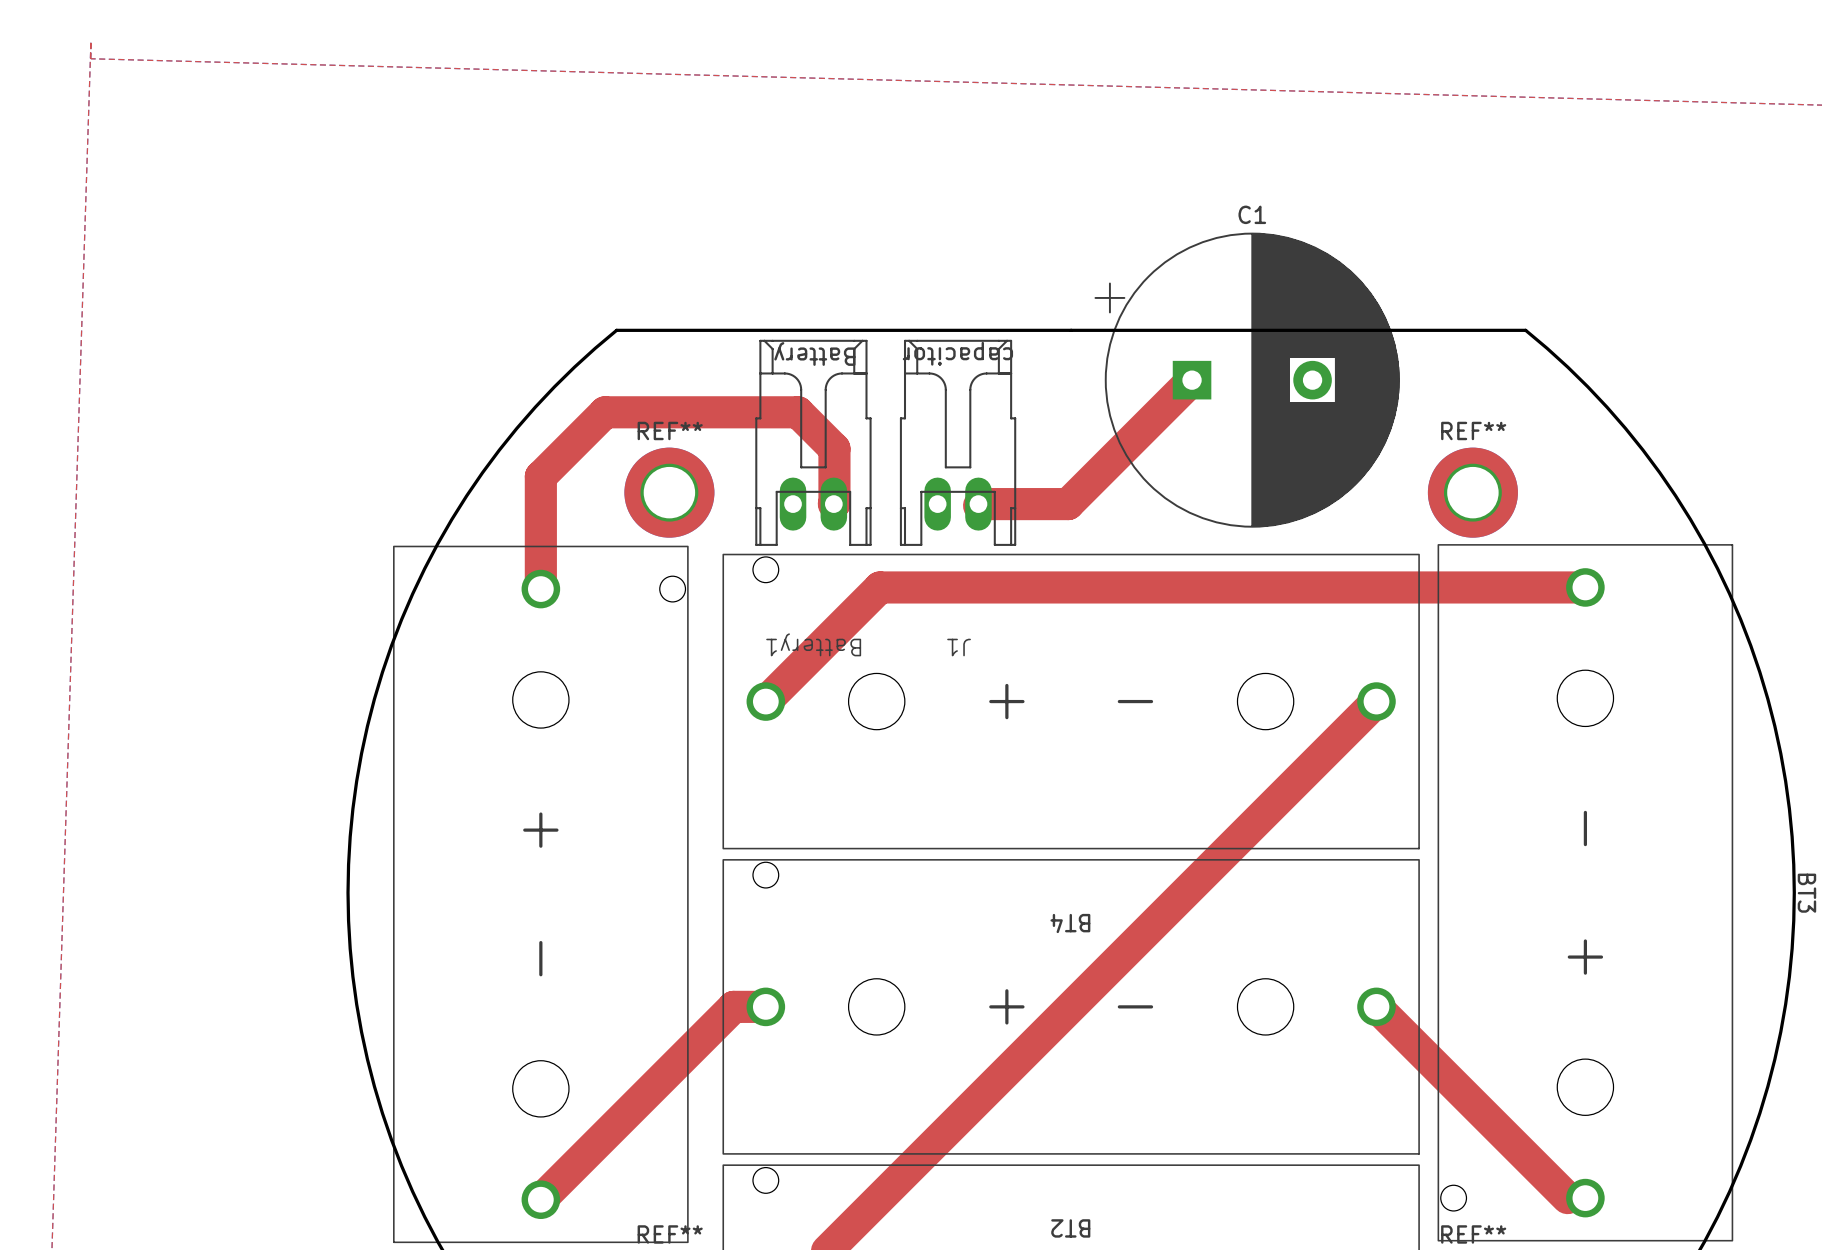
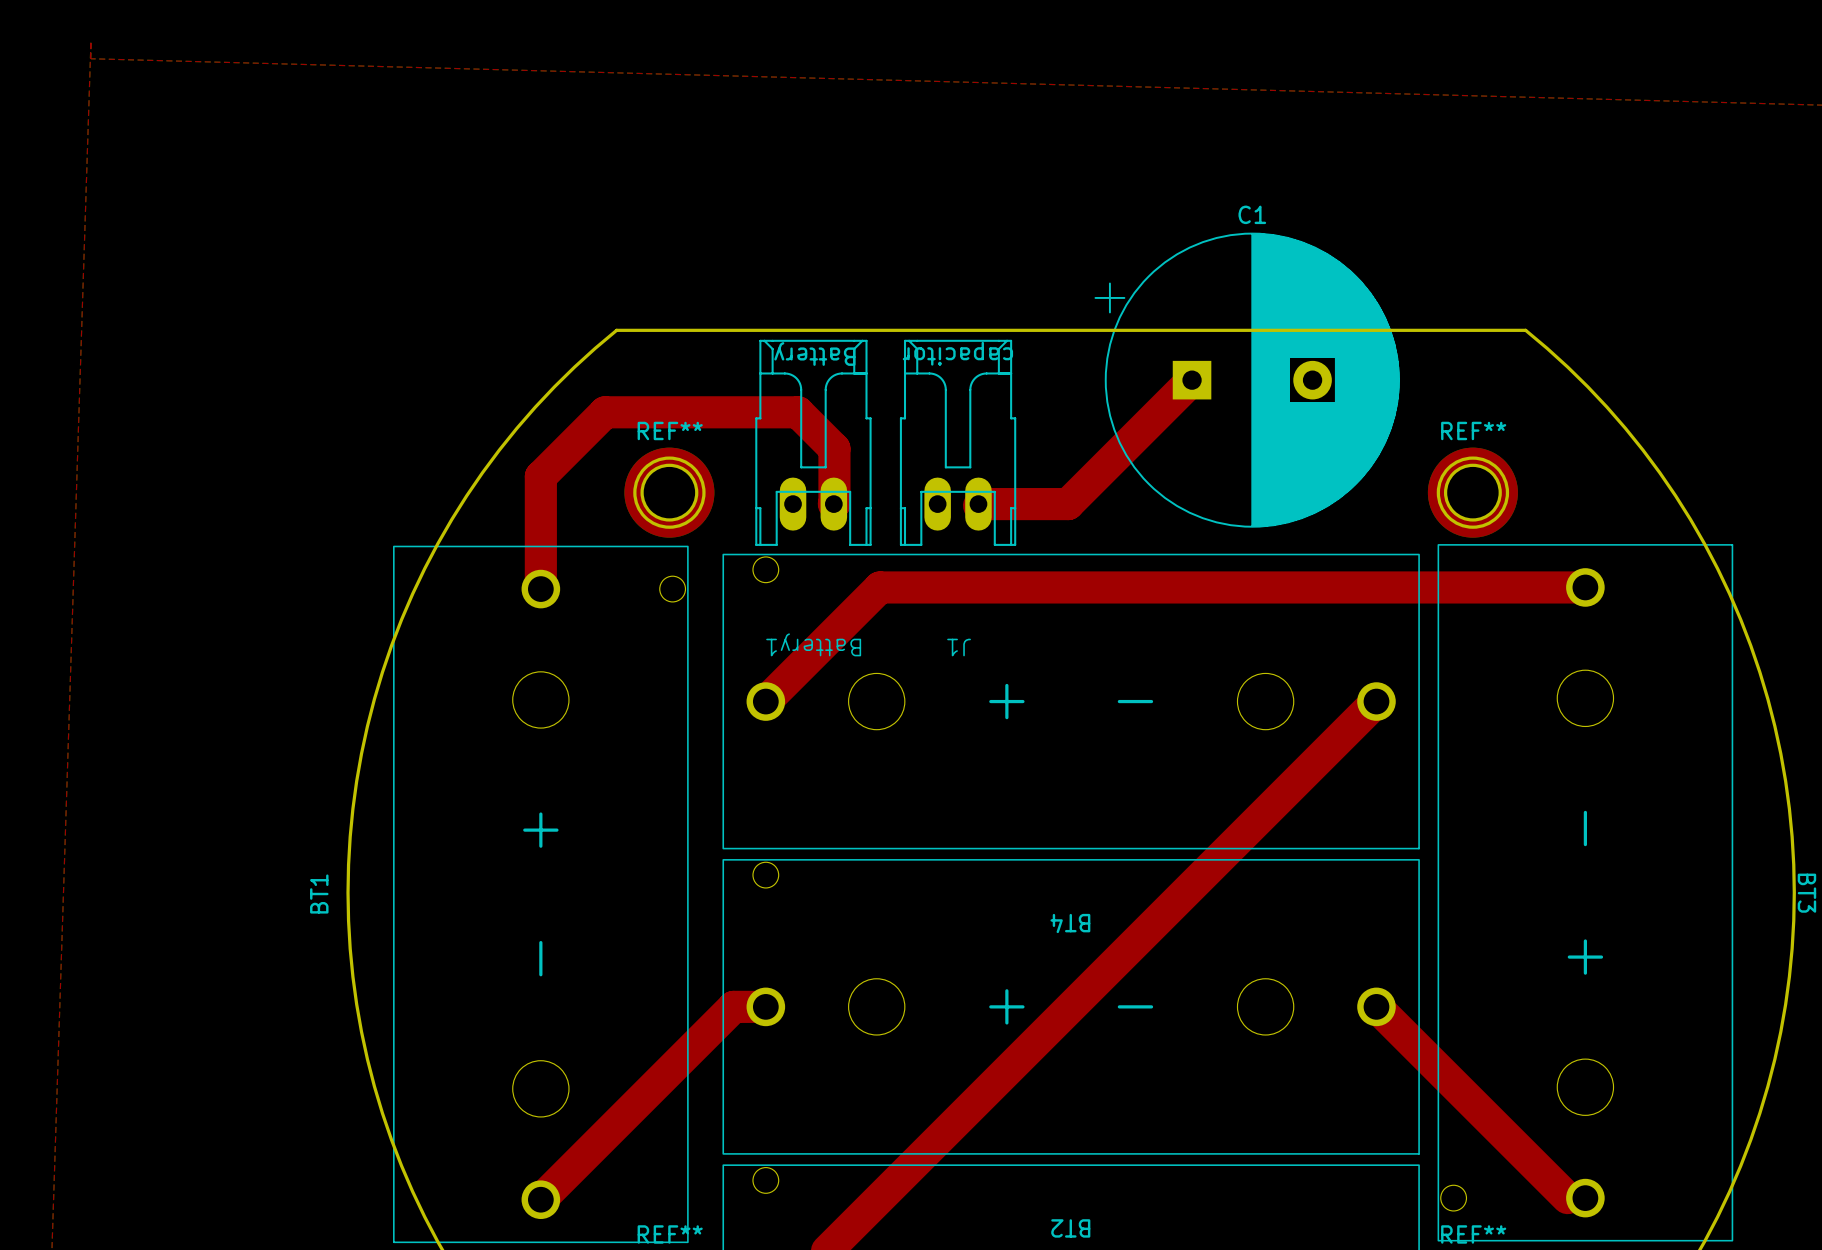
round board edge: none -> [633, 456, 706, 529]
round board edge: none -> [1436, 456, 1510, 529]
BT1 name: none -> BT1 (319, 894)

